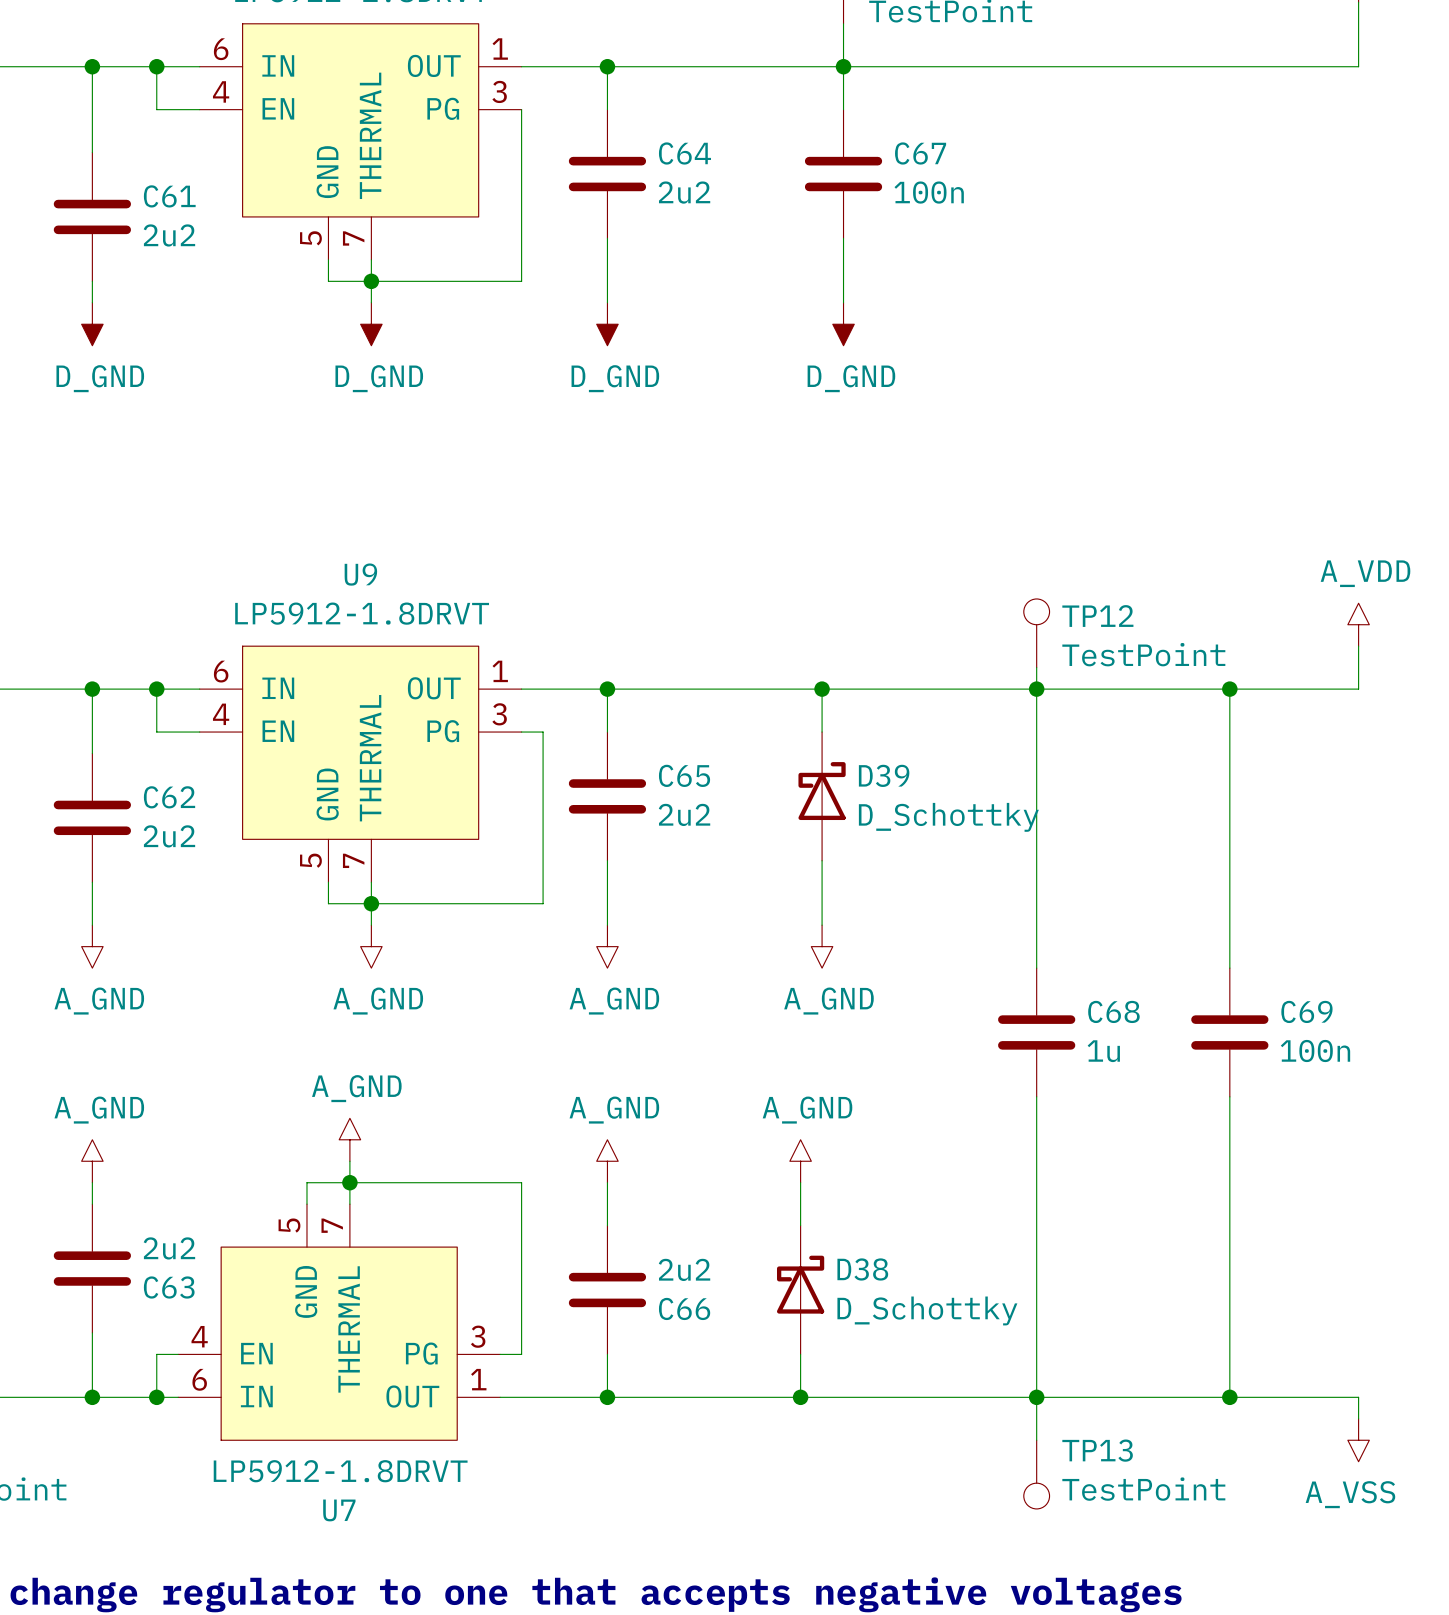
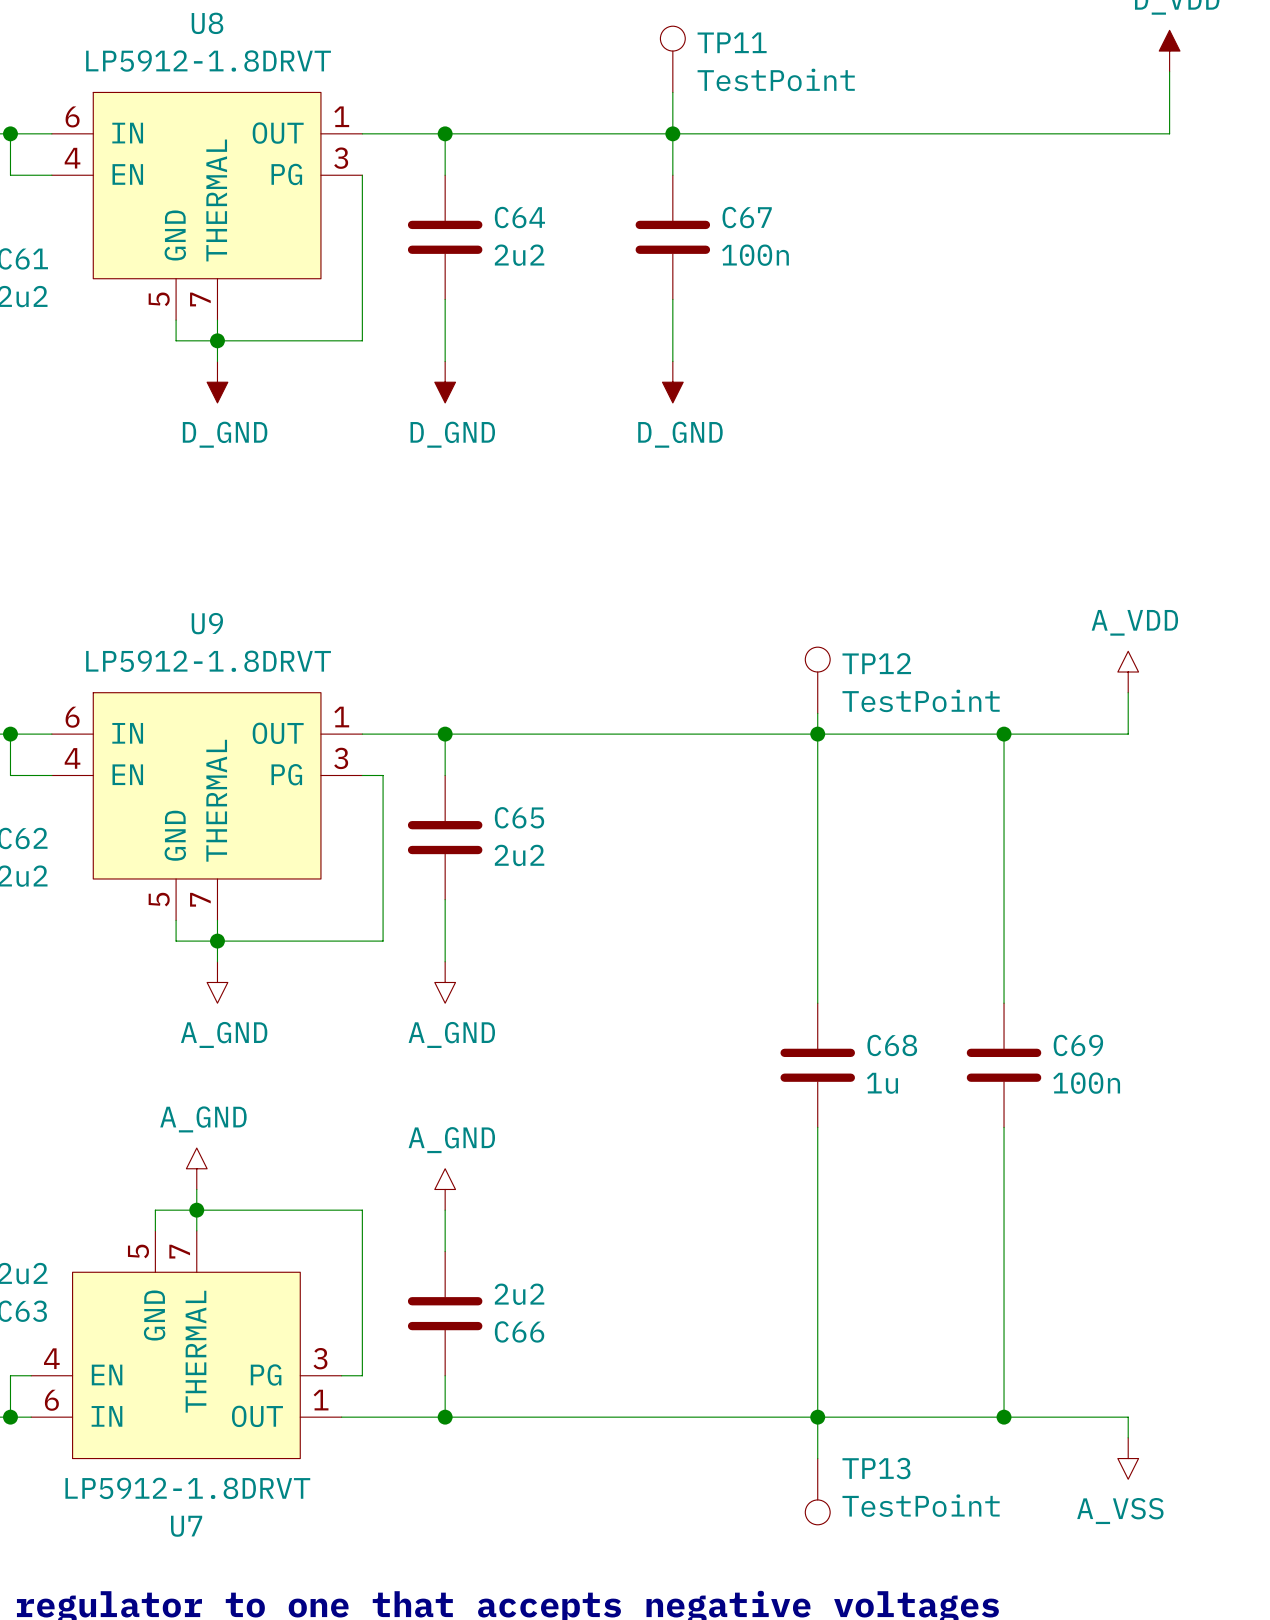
power symbol position: A_VDD (1358, 624) -> A_VDD (1128, 672)
TP12 position: (1036, 633) -> (817, 680)
wire: (1358, 646) (1358, 689) (1315, 689) -> (1128, 692) (1128, 734)
wire: (1036, 667) (1036, 968) -> (817, 713) (817, 1003)
wire: (822, 689) (822, 732) -> none
junction: (822, 689) -> none
junction position: (1036, 689) -> (817, 734)
wire: (1229, 689) (1229, 968) -> (1004, 734) (1004, 1003)
junction position: (1229, 689) -> (1004, 734)
D39: D_Schottky (822, 796) -> none
wire: (822, 860) (822, 925) -> none
power symbol: A_GND (822, 946) -> none
C68 position: (1036, 1032) -> (817, 1065)
C69 position: (1229, 1032) -> (1004, 1065)
wire: (1036, 1096) (1036, 1440) -> (817, 1127) (817, 1458)
wire: (1229, 1096) (1229, 1397) -> (1004, 1127) (1004, 1417)
power symbol: A_GND (800, 1161) -> none
wire: (800, 1182) (800, 1225) -> none
D38: D_Schottky (800, 1290) -> none
wire: (800, 1354) (800, 1397) -> none
junction: (800, 1397) -> none
junction position: (1036, 1397) -> (817, 1417)
junction position: (1229, 1397) -> (1004, 1417)
wire: (1315, 1397) (1358, 1397) (1358, 1418) -> (1128, 1417) (1128, 1437)
power symbol position: A_VSS (1358, 1440) -> A_VSS (1128, 1458)
TP13 position: (1036, 1474) -> (817, 1491)

